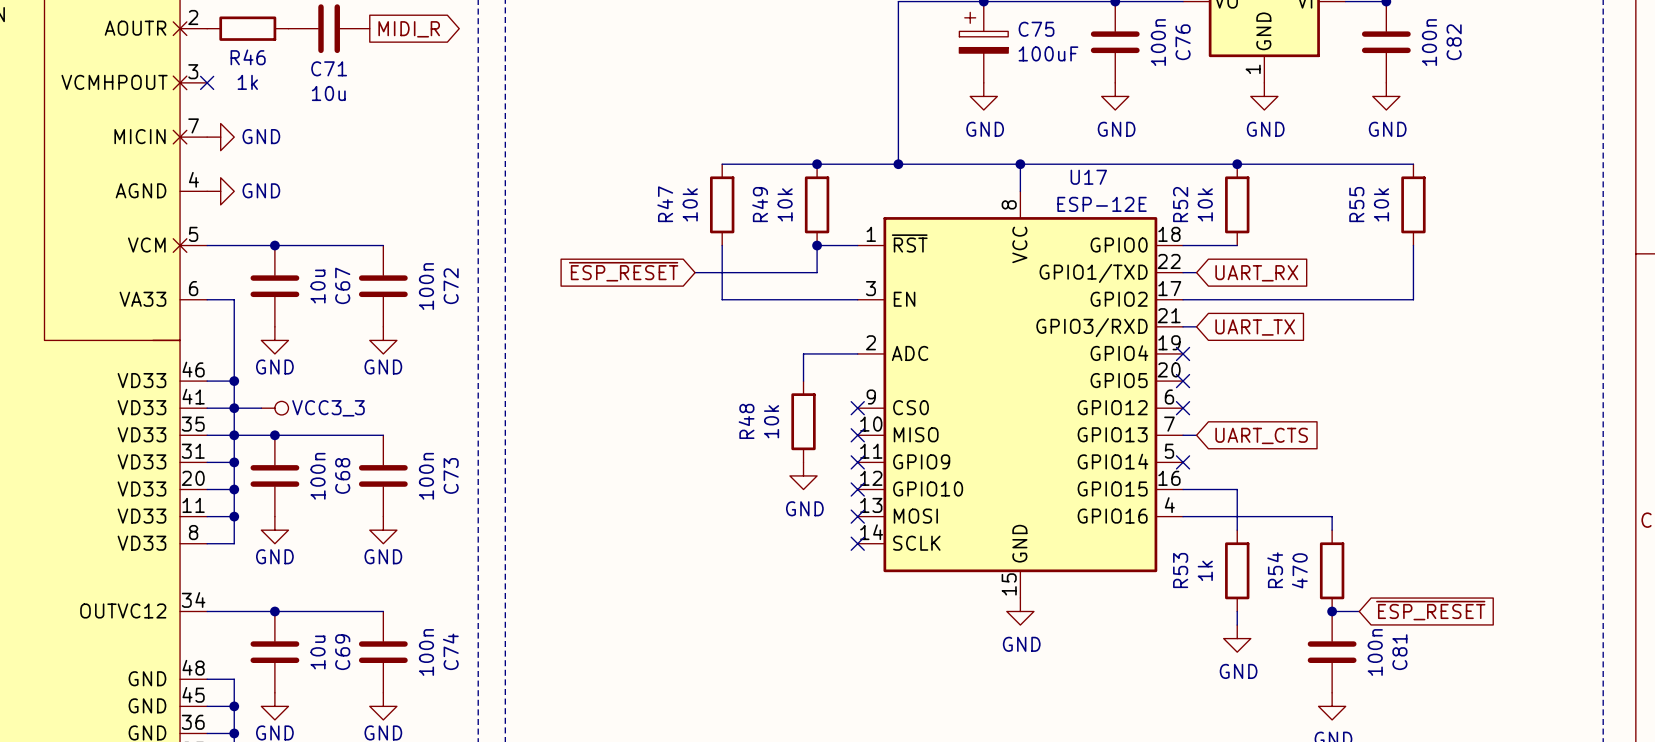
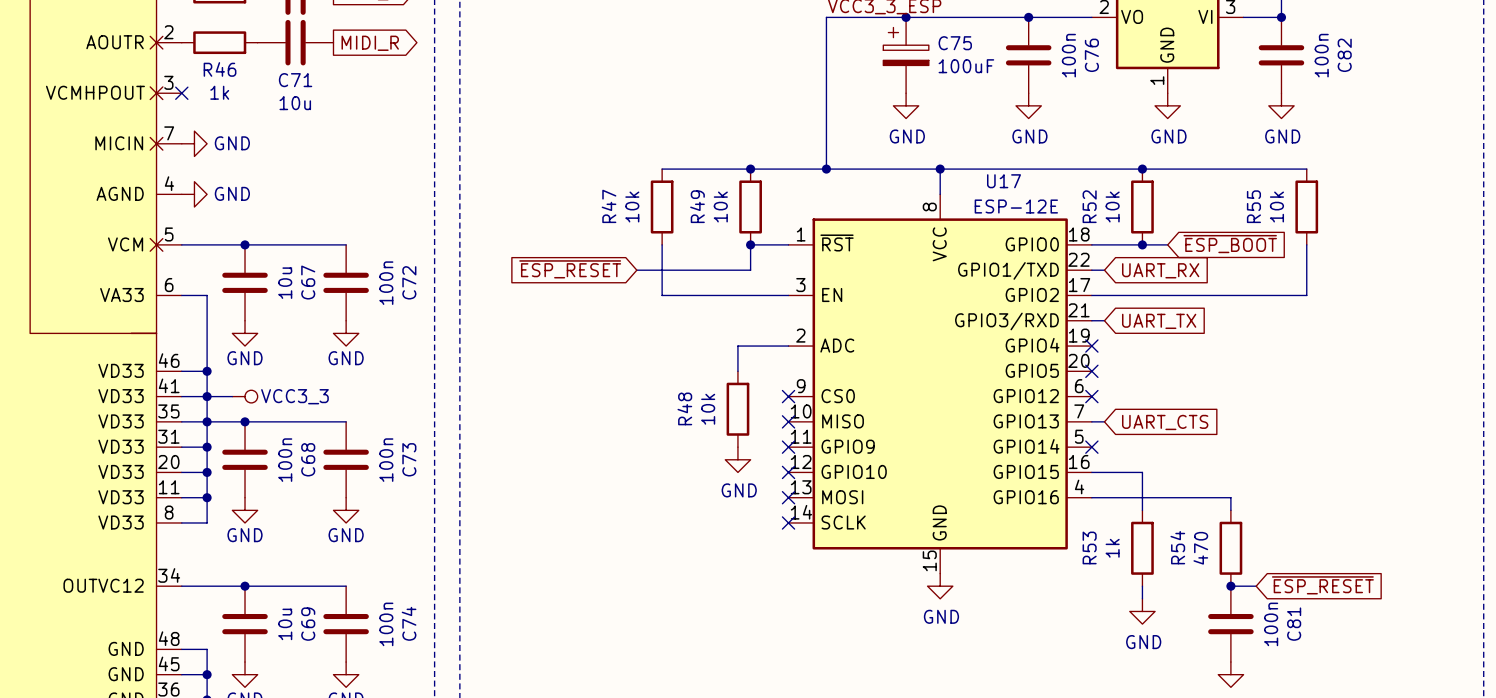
global label: none -> ~{ESP_BOOT} (1230, 244)
wire: none -> (1142, 244) (1167, 244)
junction: none -> (1142, 244)

